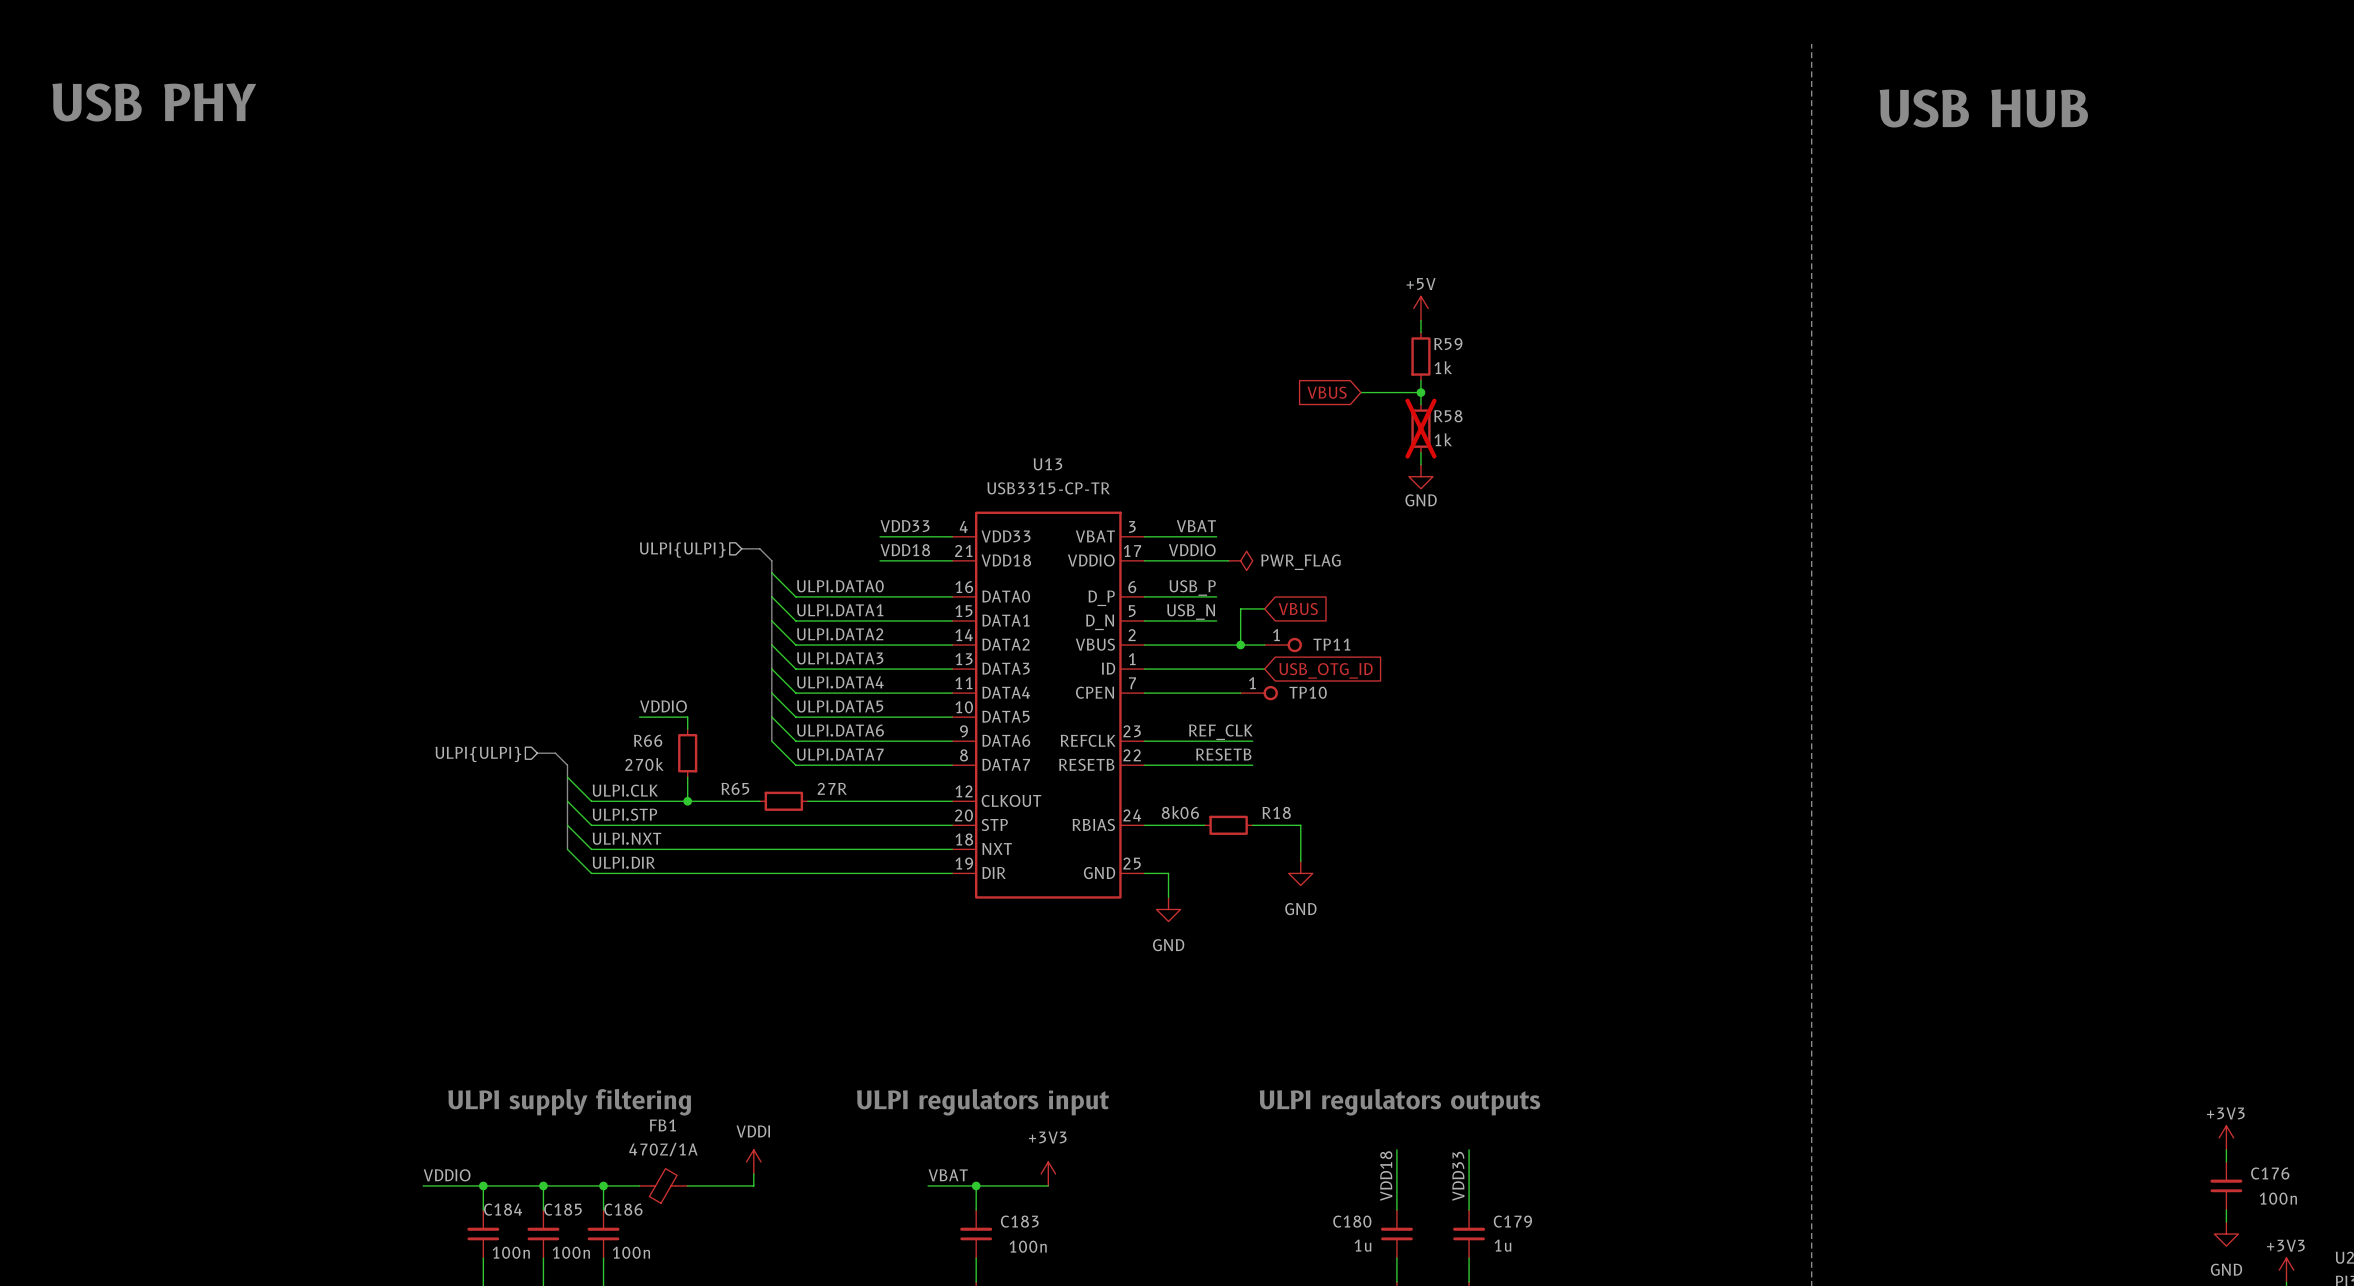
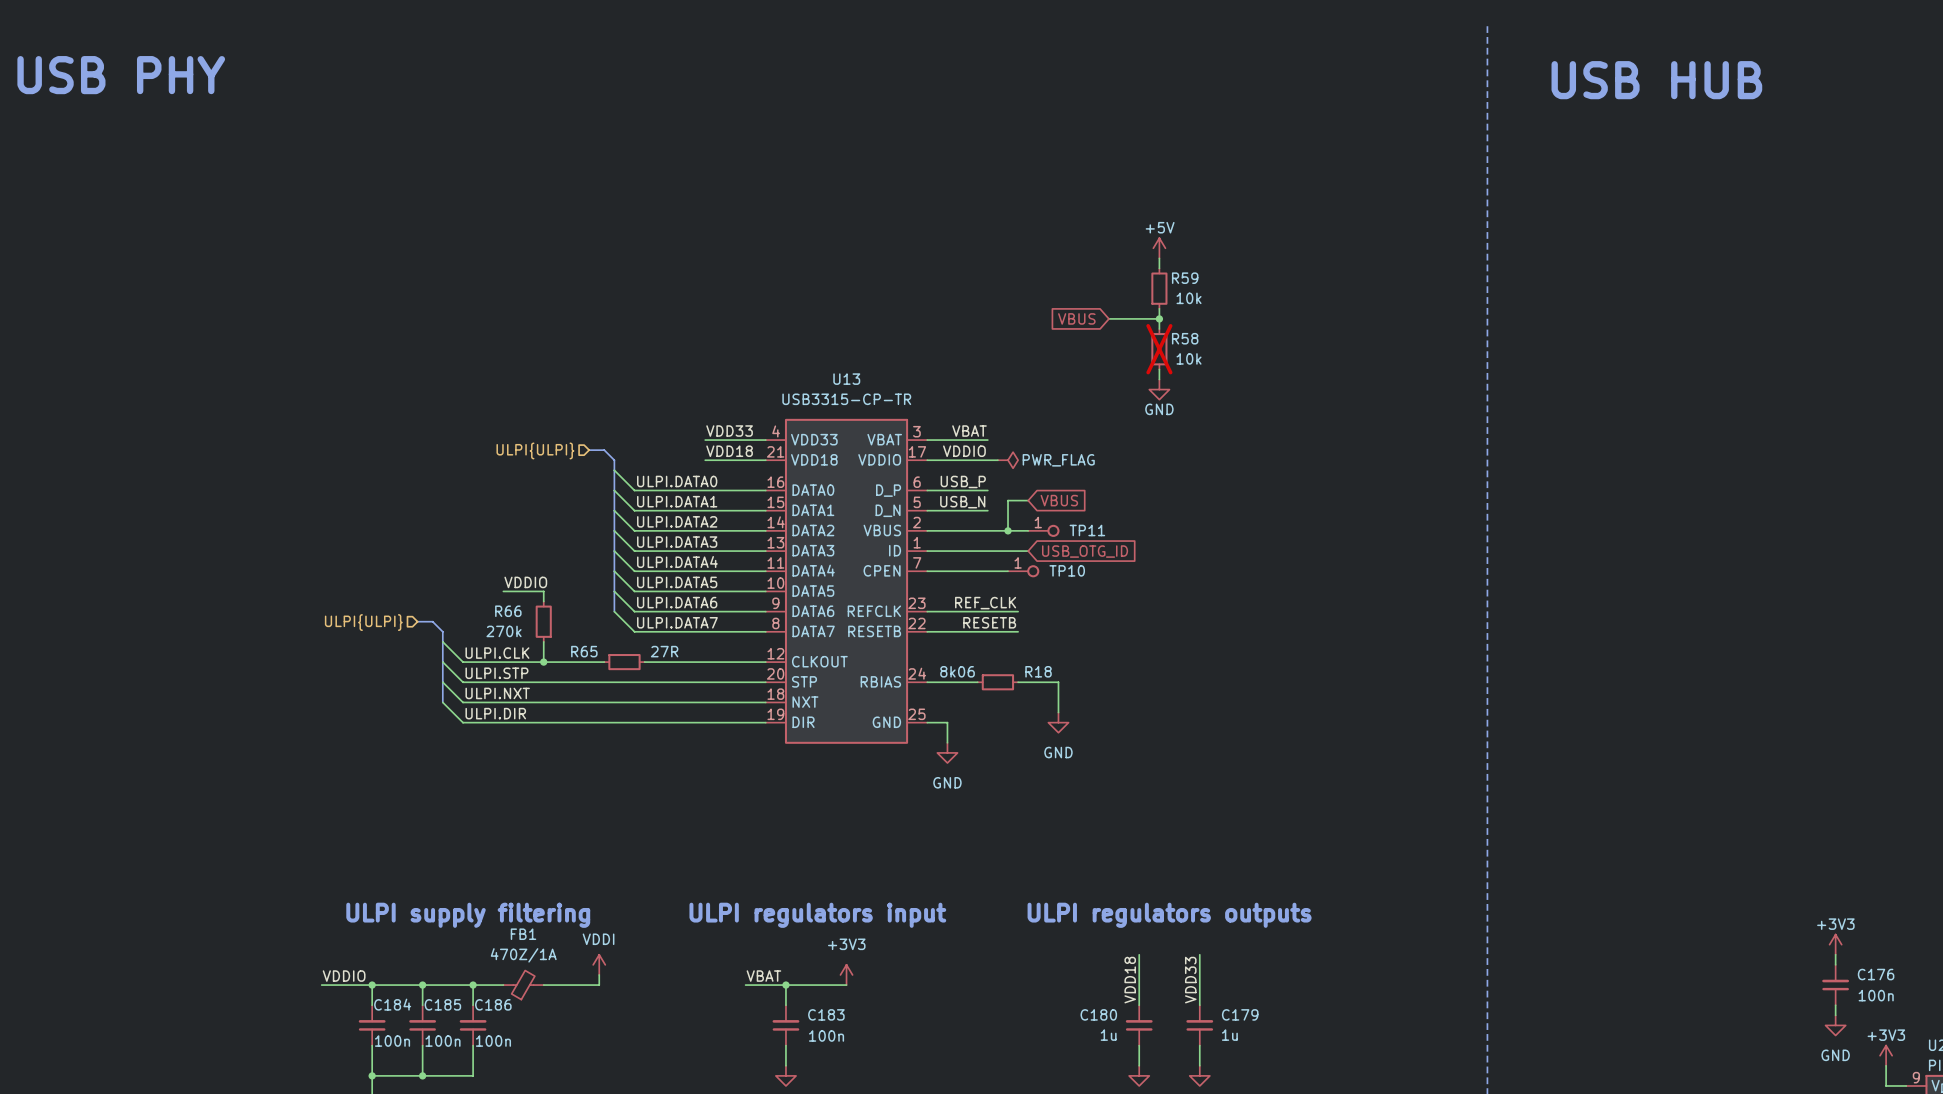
R59 text: 1k (1443, 367) -> 10k (1189, 298)
R58 text: 1k (1443, 439) -> 10k (1189, 358)

